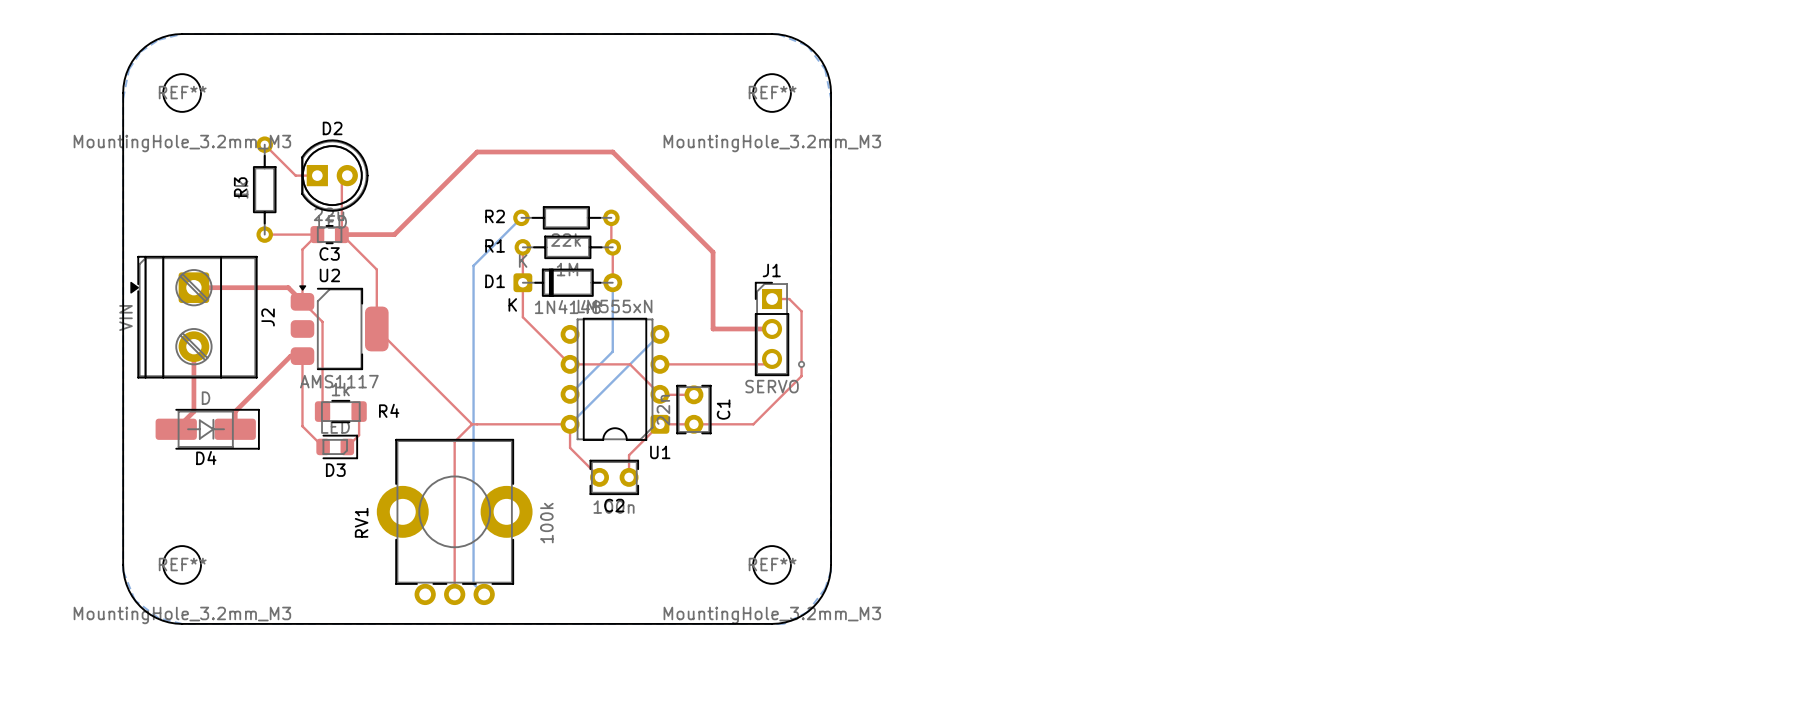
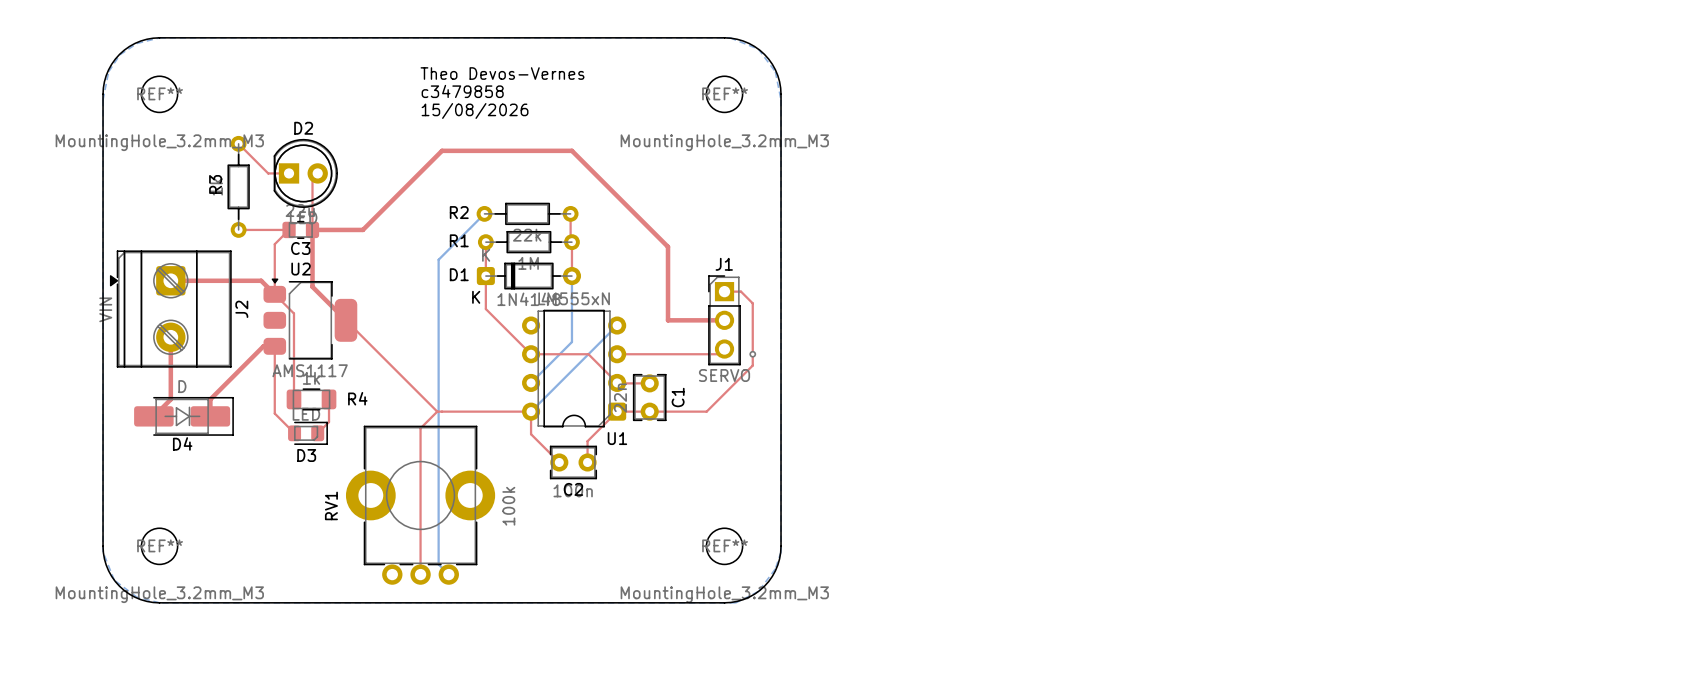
text: none -> Theo Devos-Vernes (502, 73)
text: none -> c3479858 (462, 91)
text: none -> 15/08/2026 (475, 110)
top track: (341, 234) (376, 269) (376, 328) -> (312, 229) (312, 286) (345, 320)

